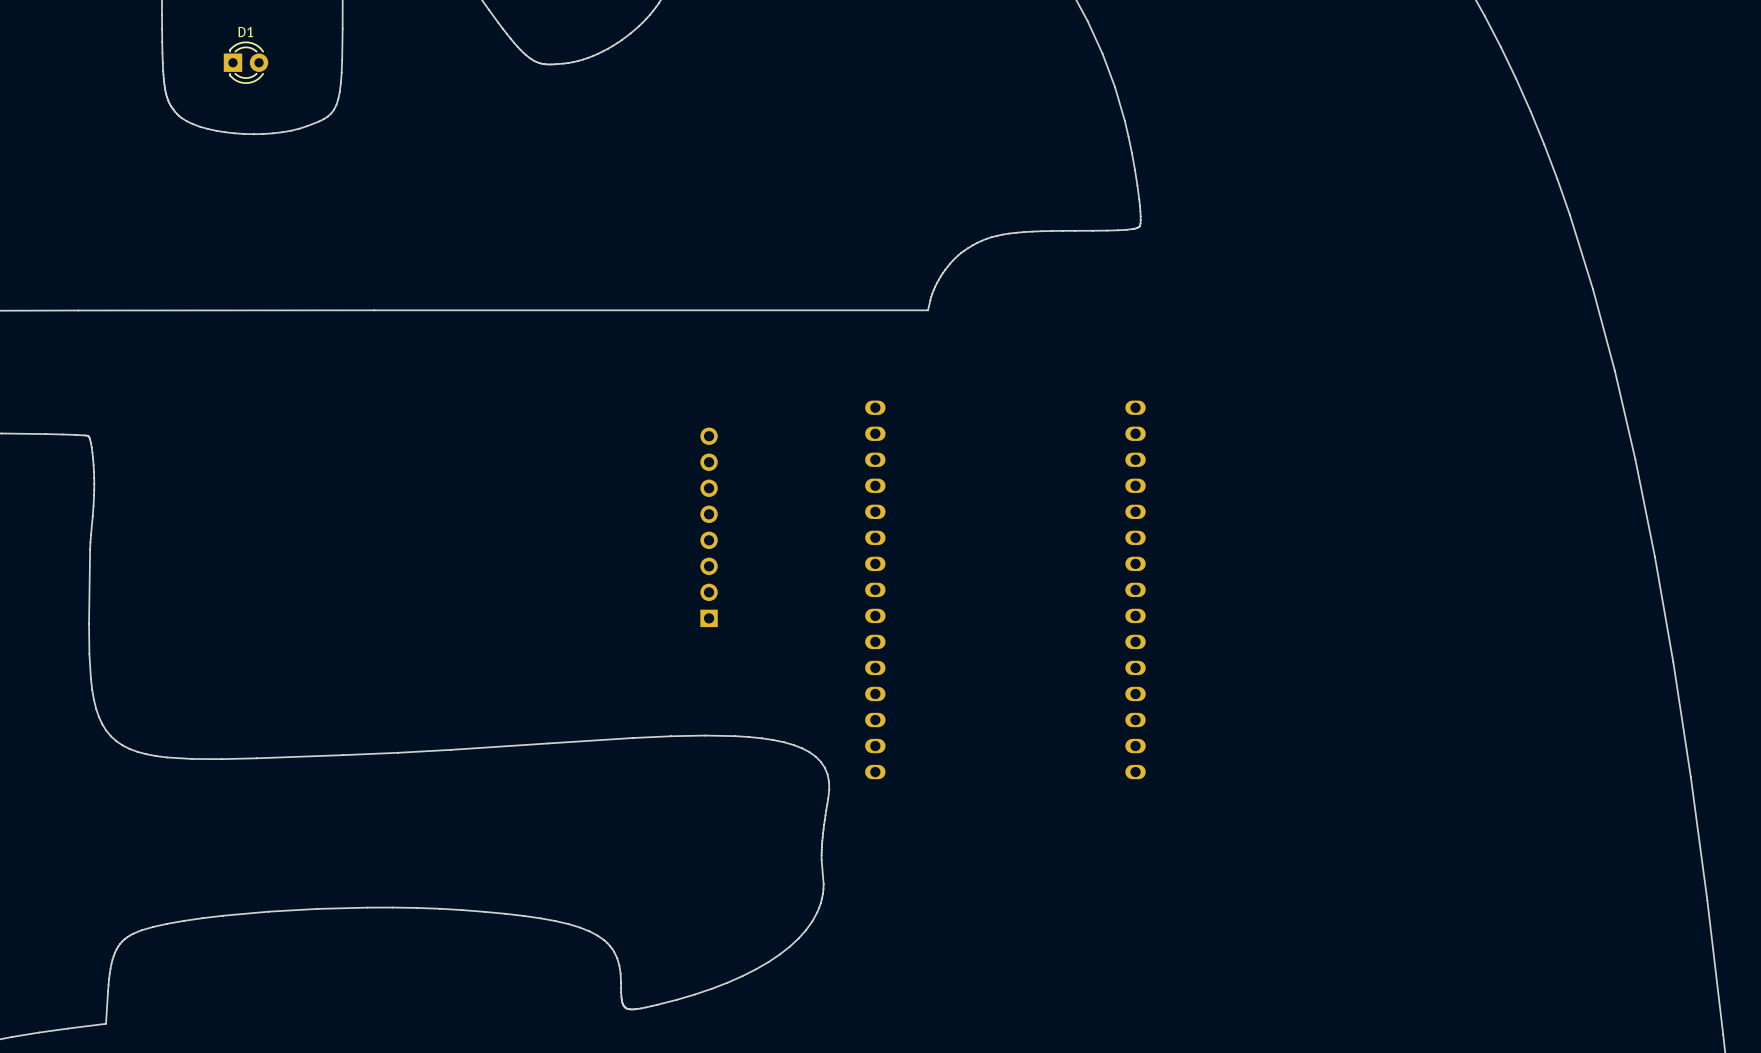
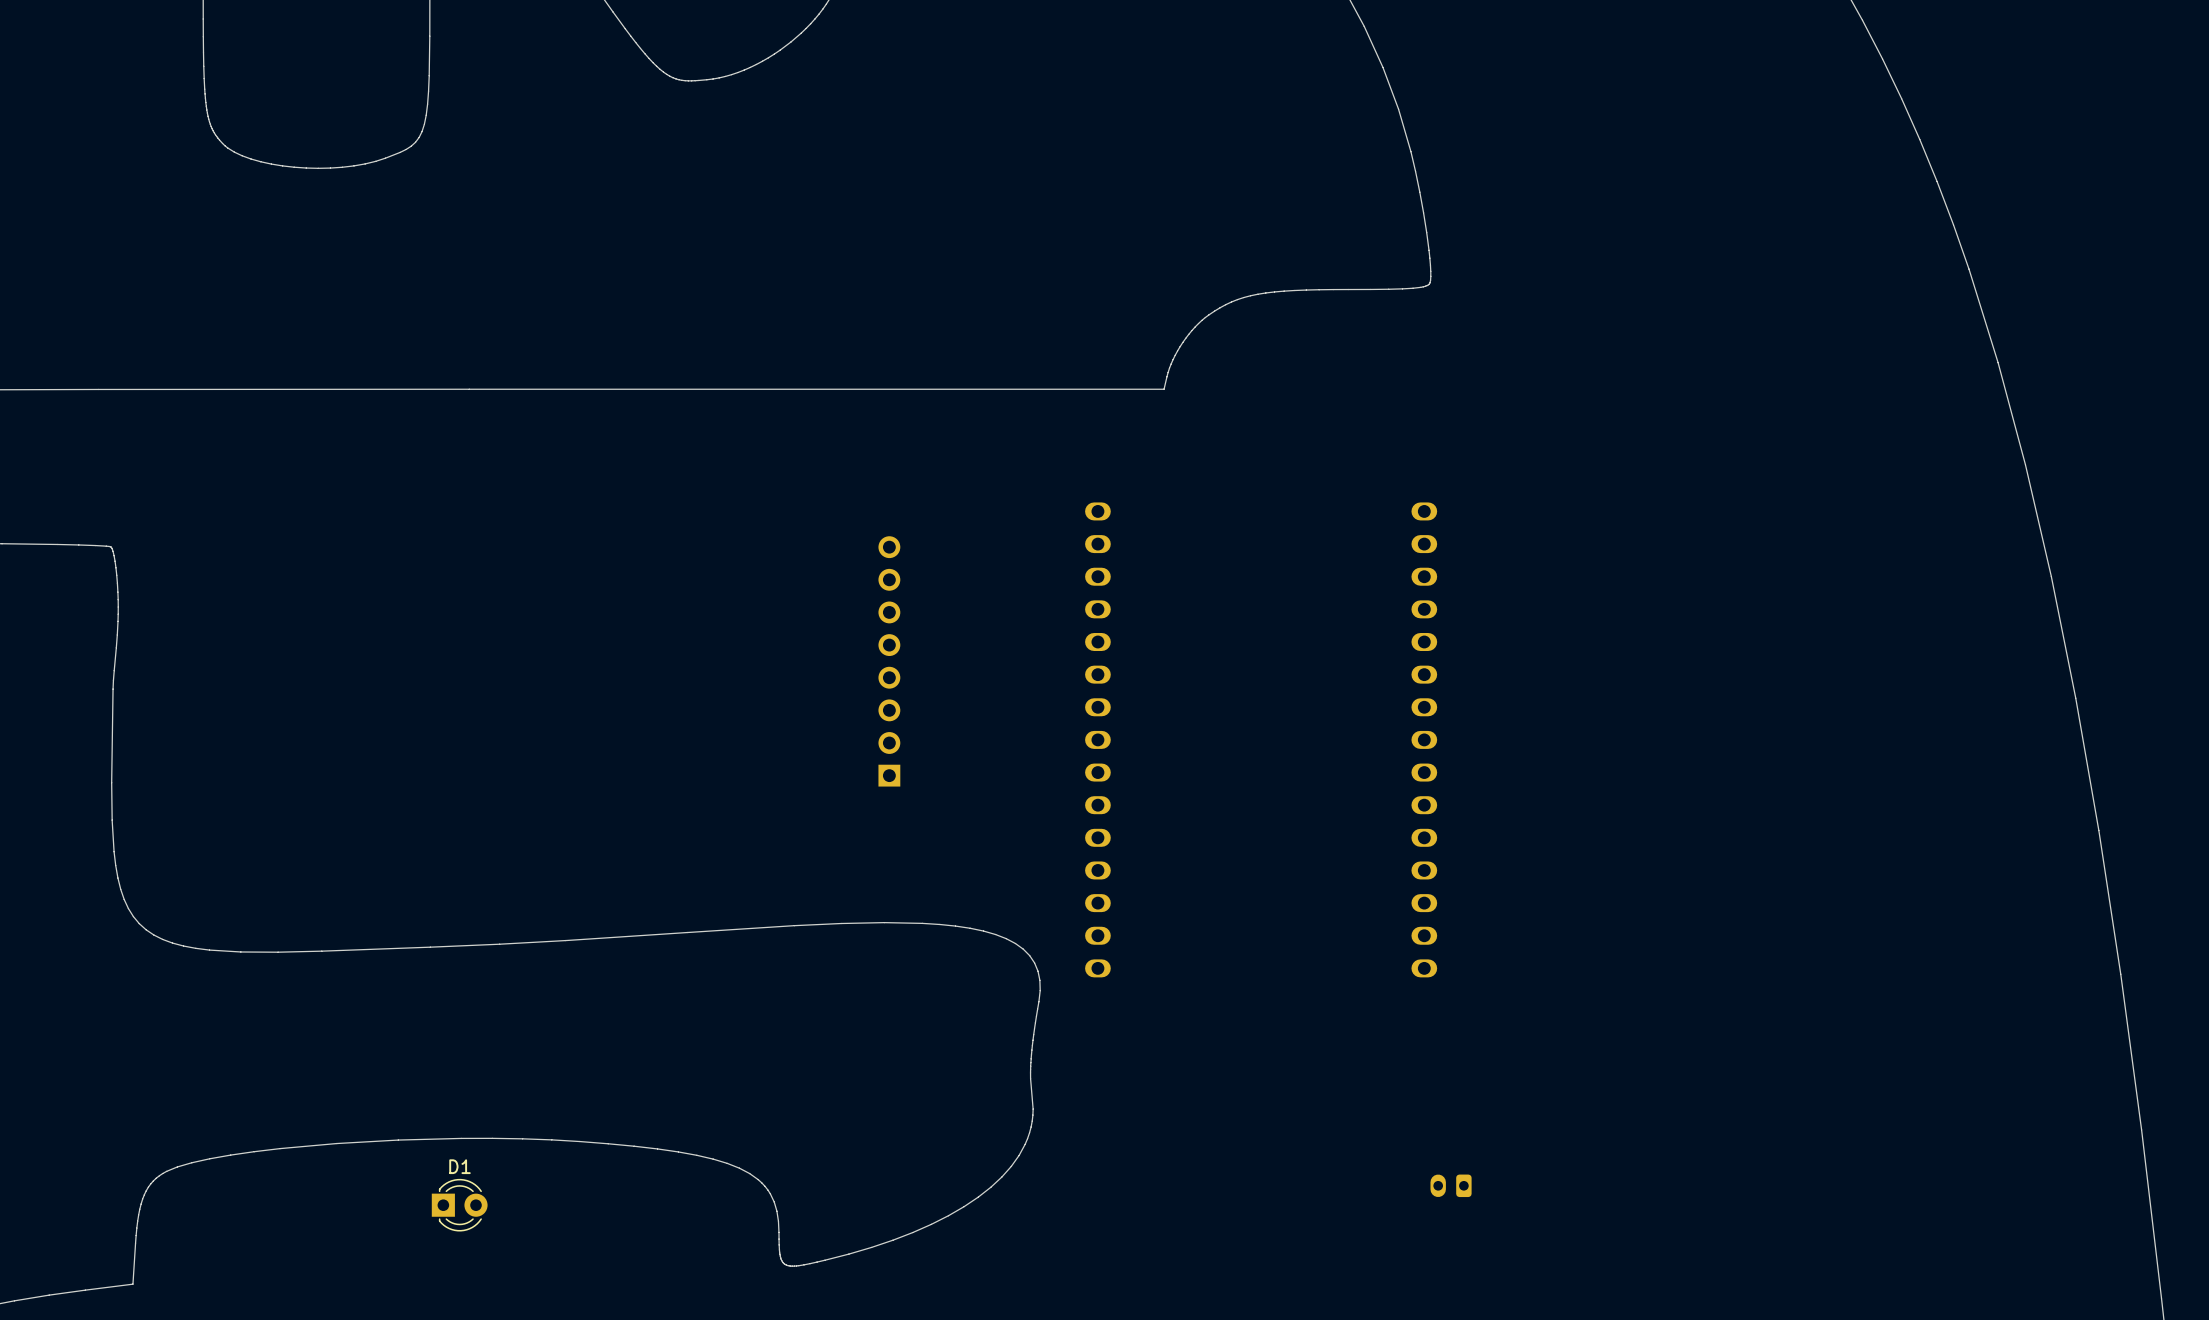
D1 position: (246, 62) -> (459, 1205)
part: none -> (1451, 1185)

